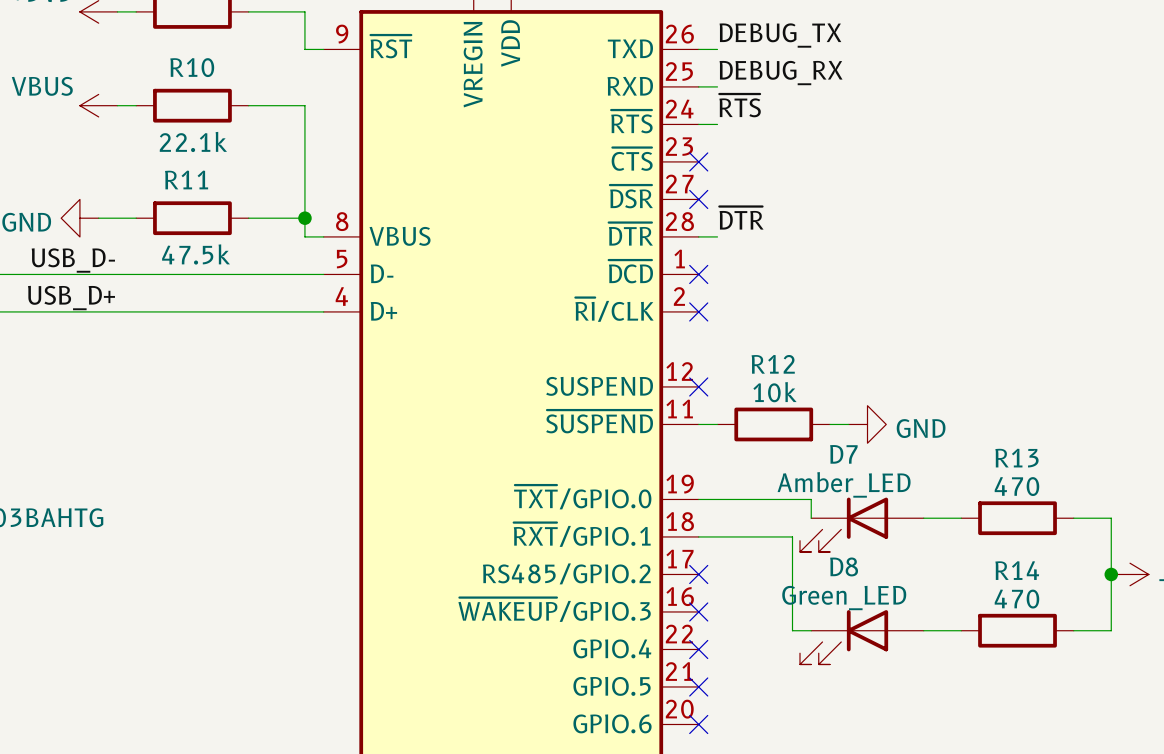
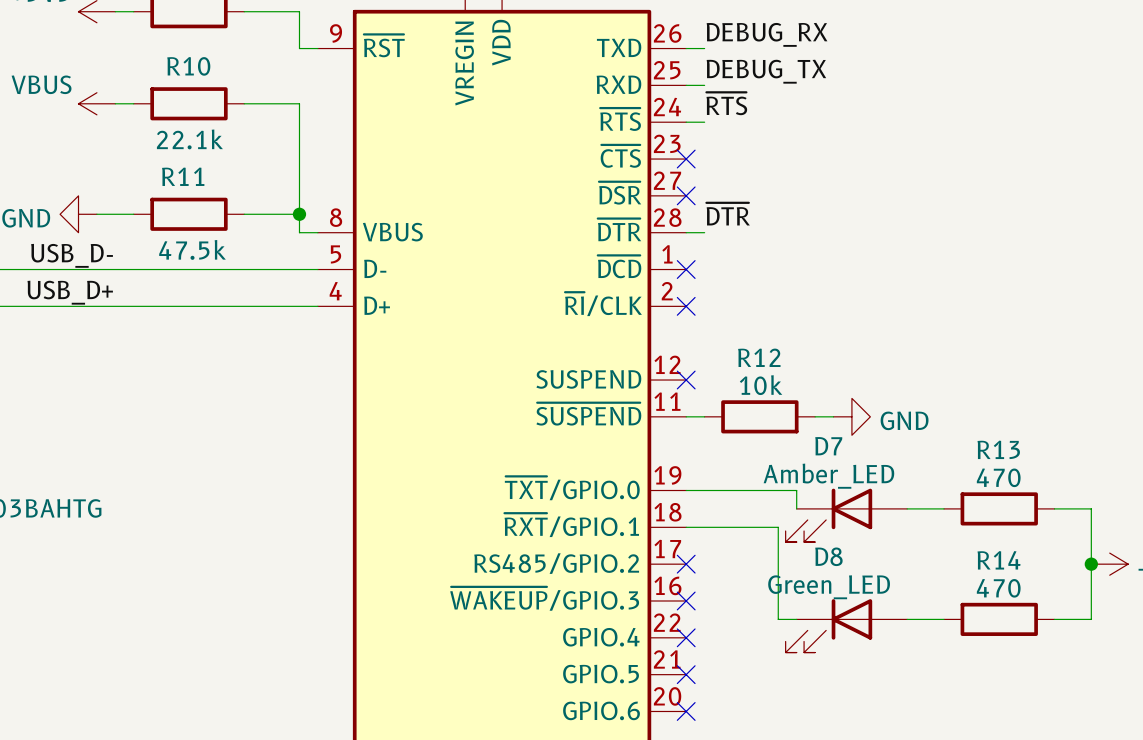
label: DEBUG_TX (780, 35) -> DEBUG_RX (767, 34)
label: DEBUG_RX (781, 73) -> DEBUG_TX (766, 71)

